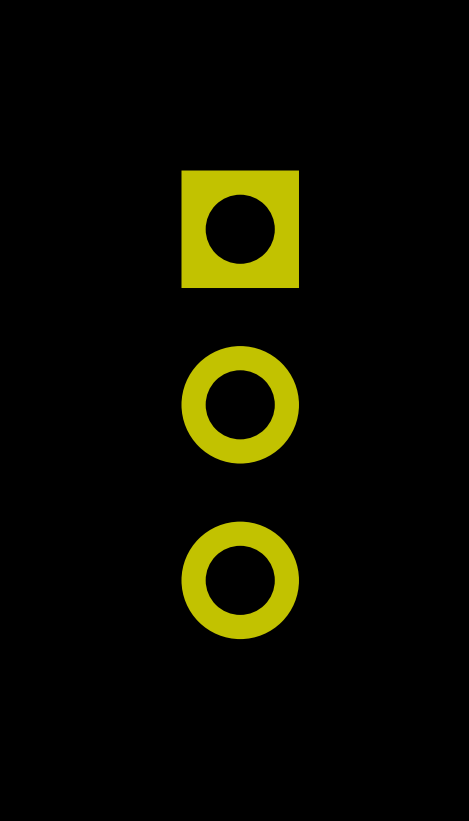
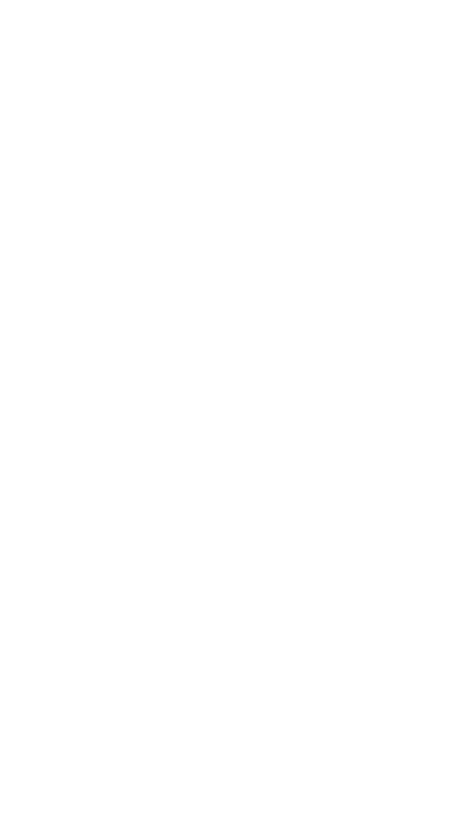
part: (240, 404) -> none

